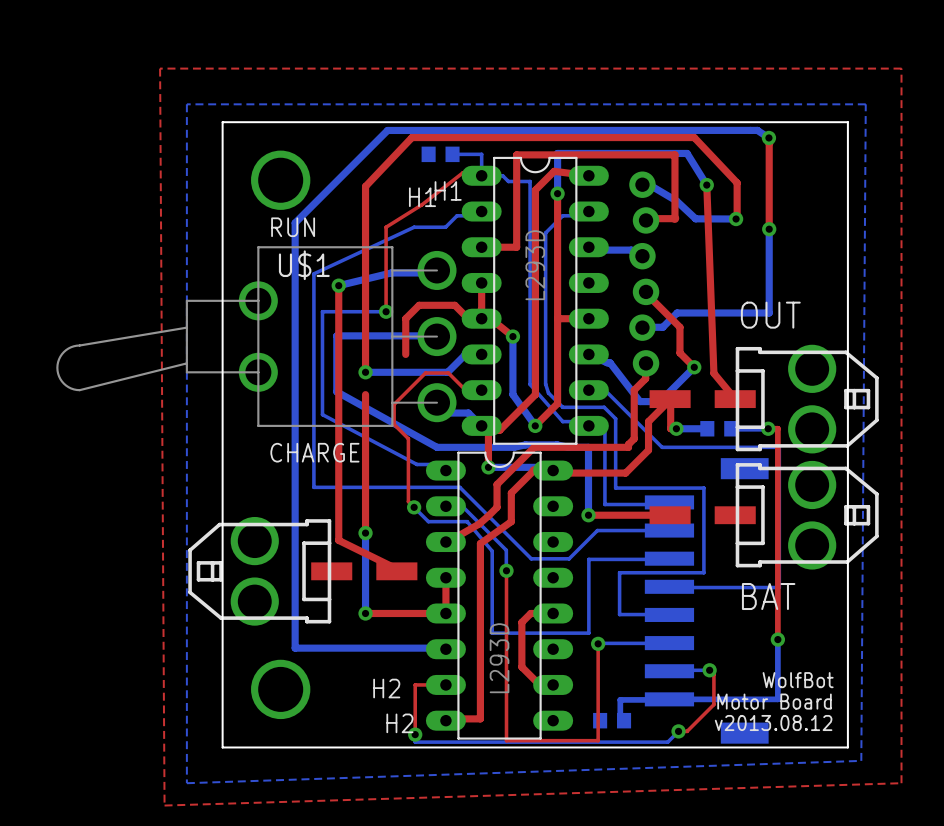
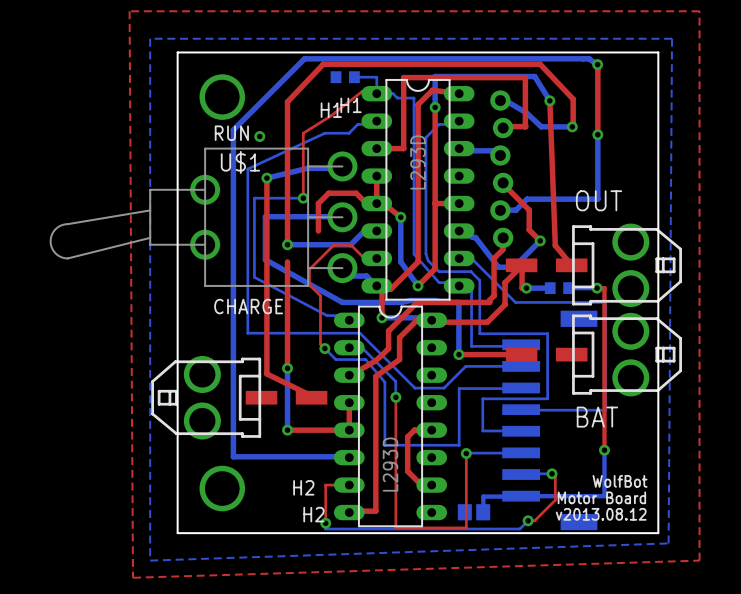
via: none -> (259, 136)
part footprint: [593, 712, 632, 729] -> [457, 504, 491, 521]

